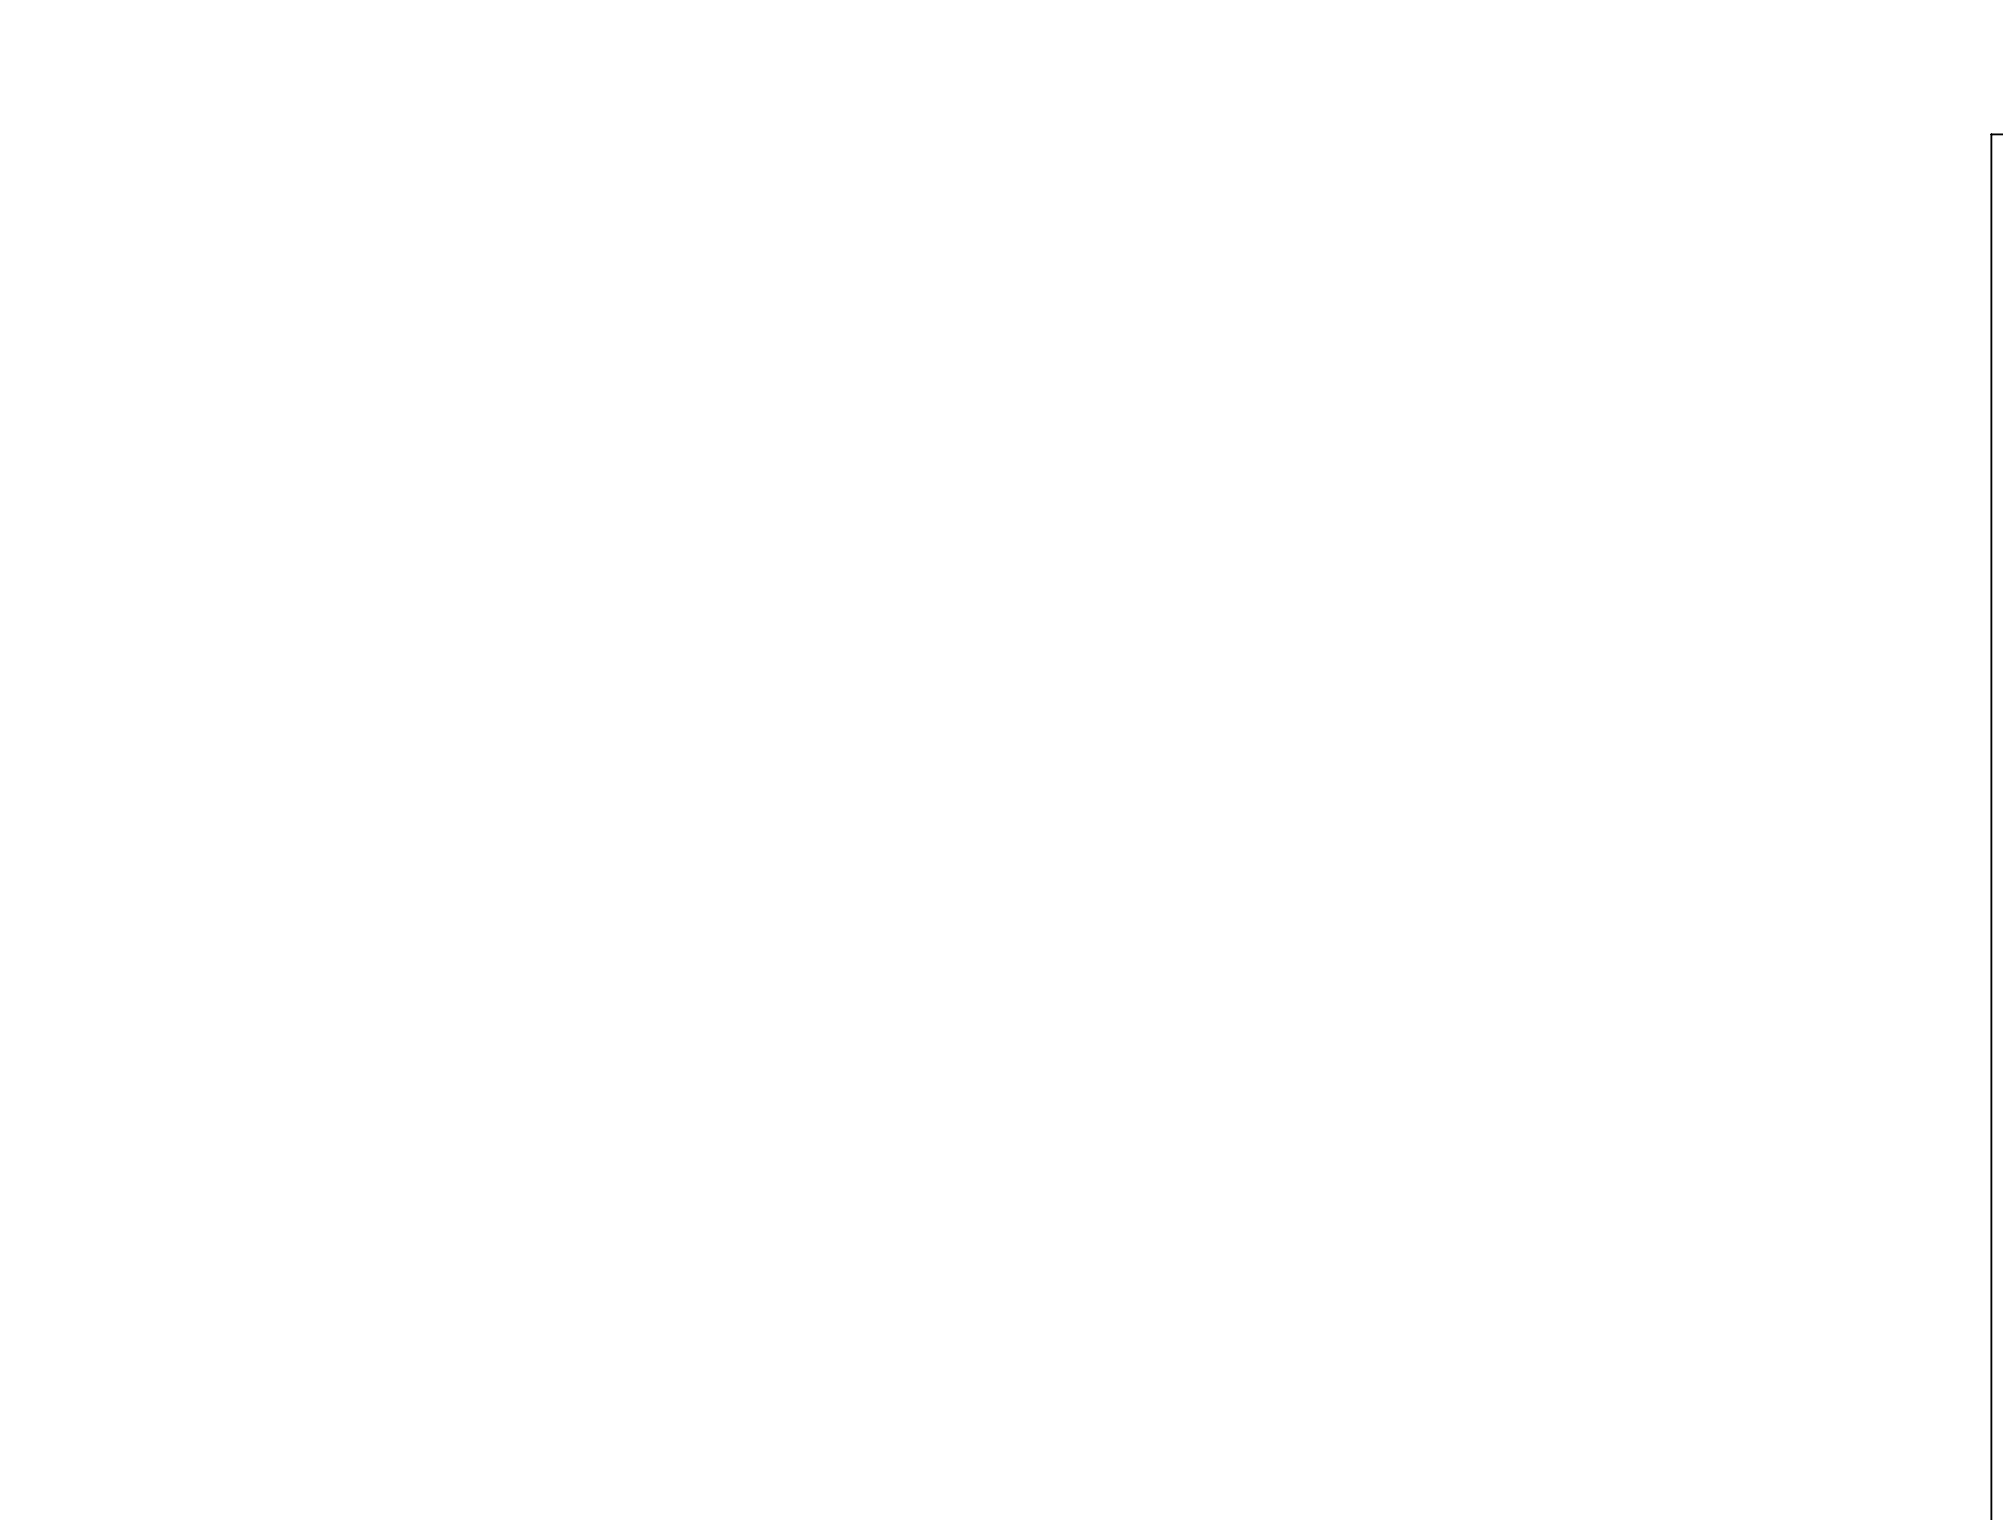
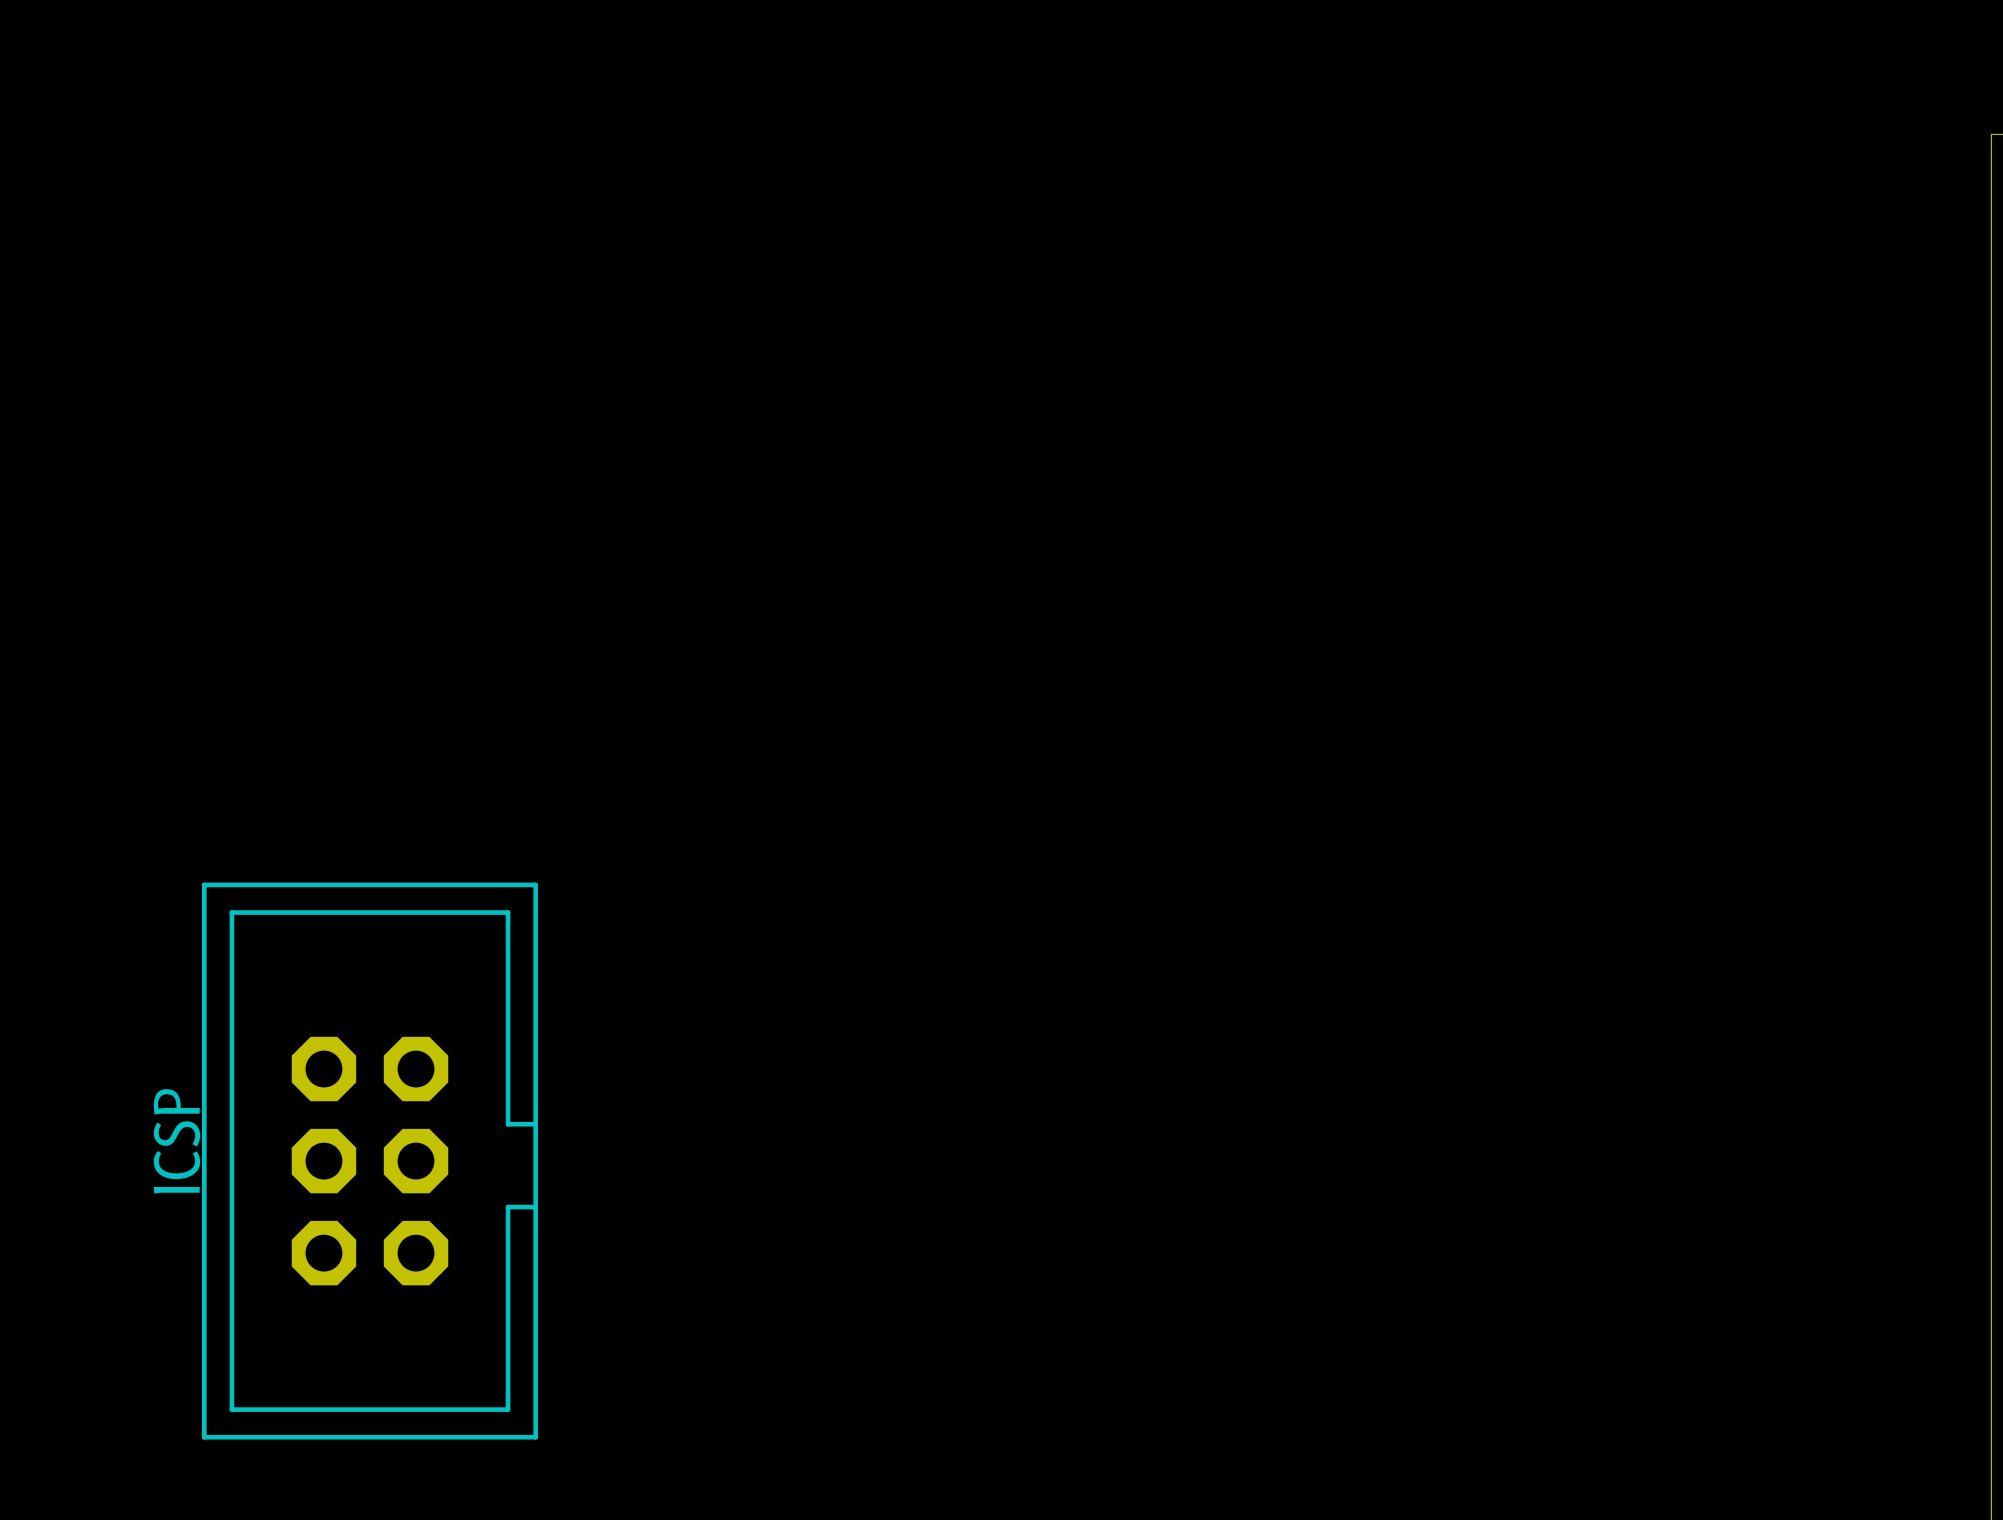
ICSP: none -> (369, 1161)

